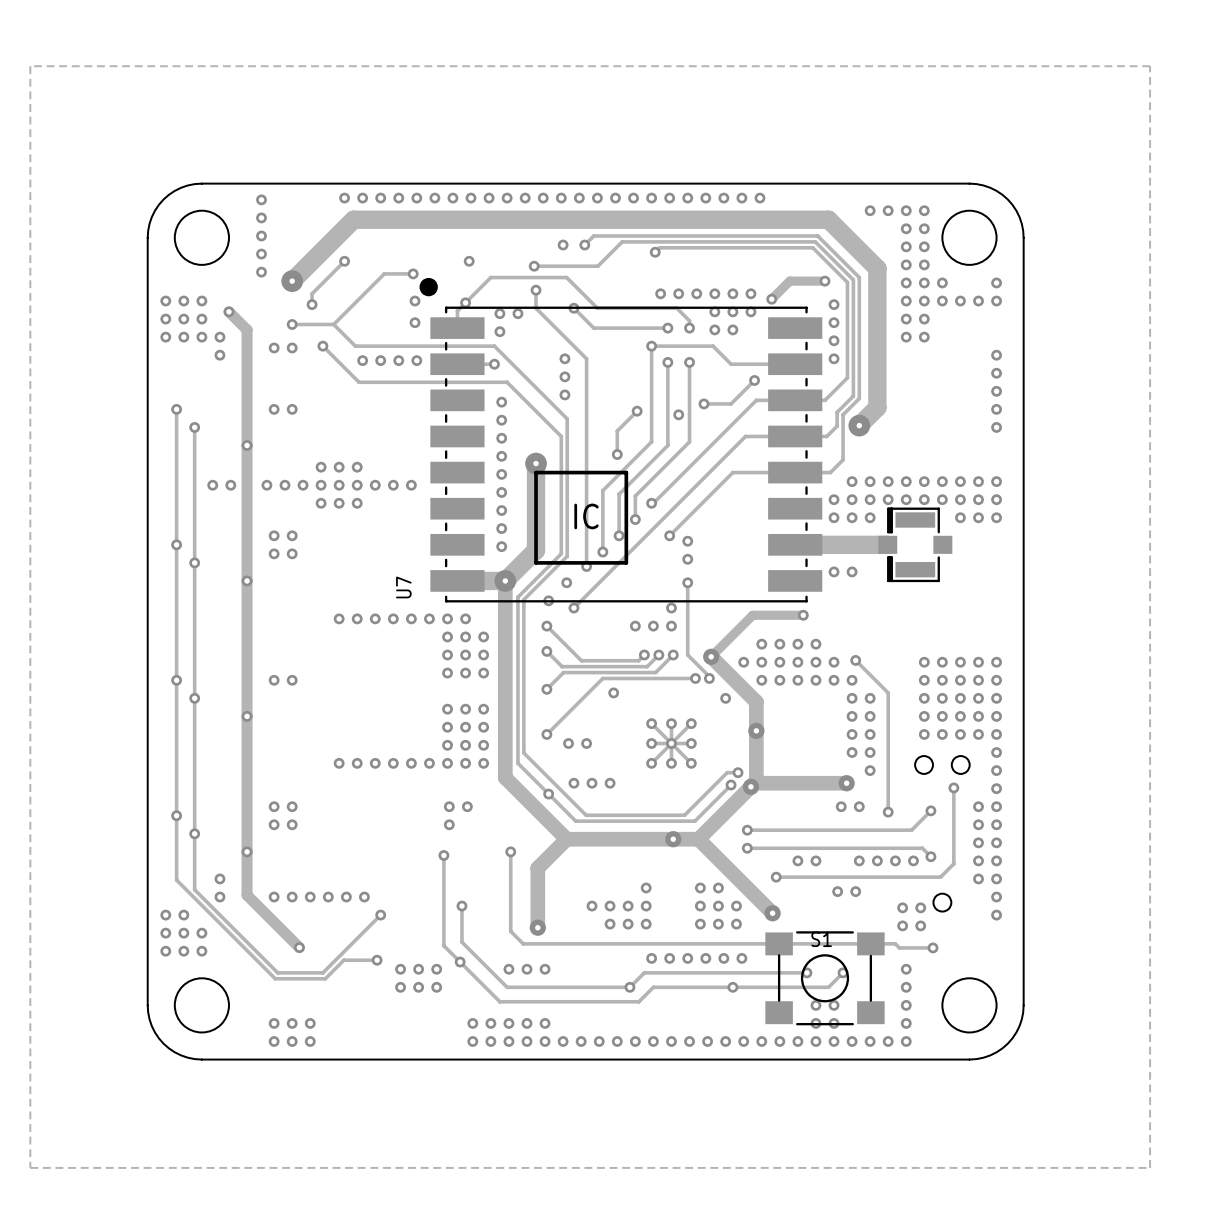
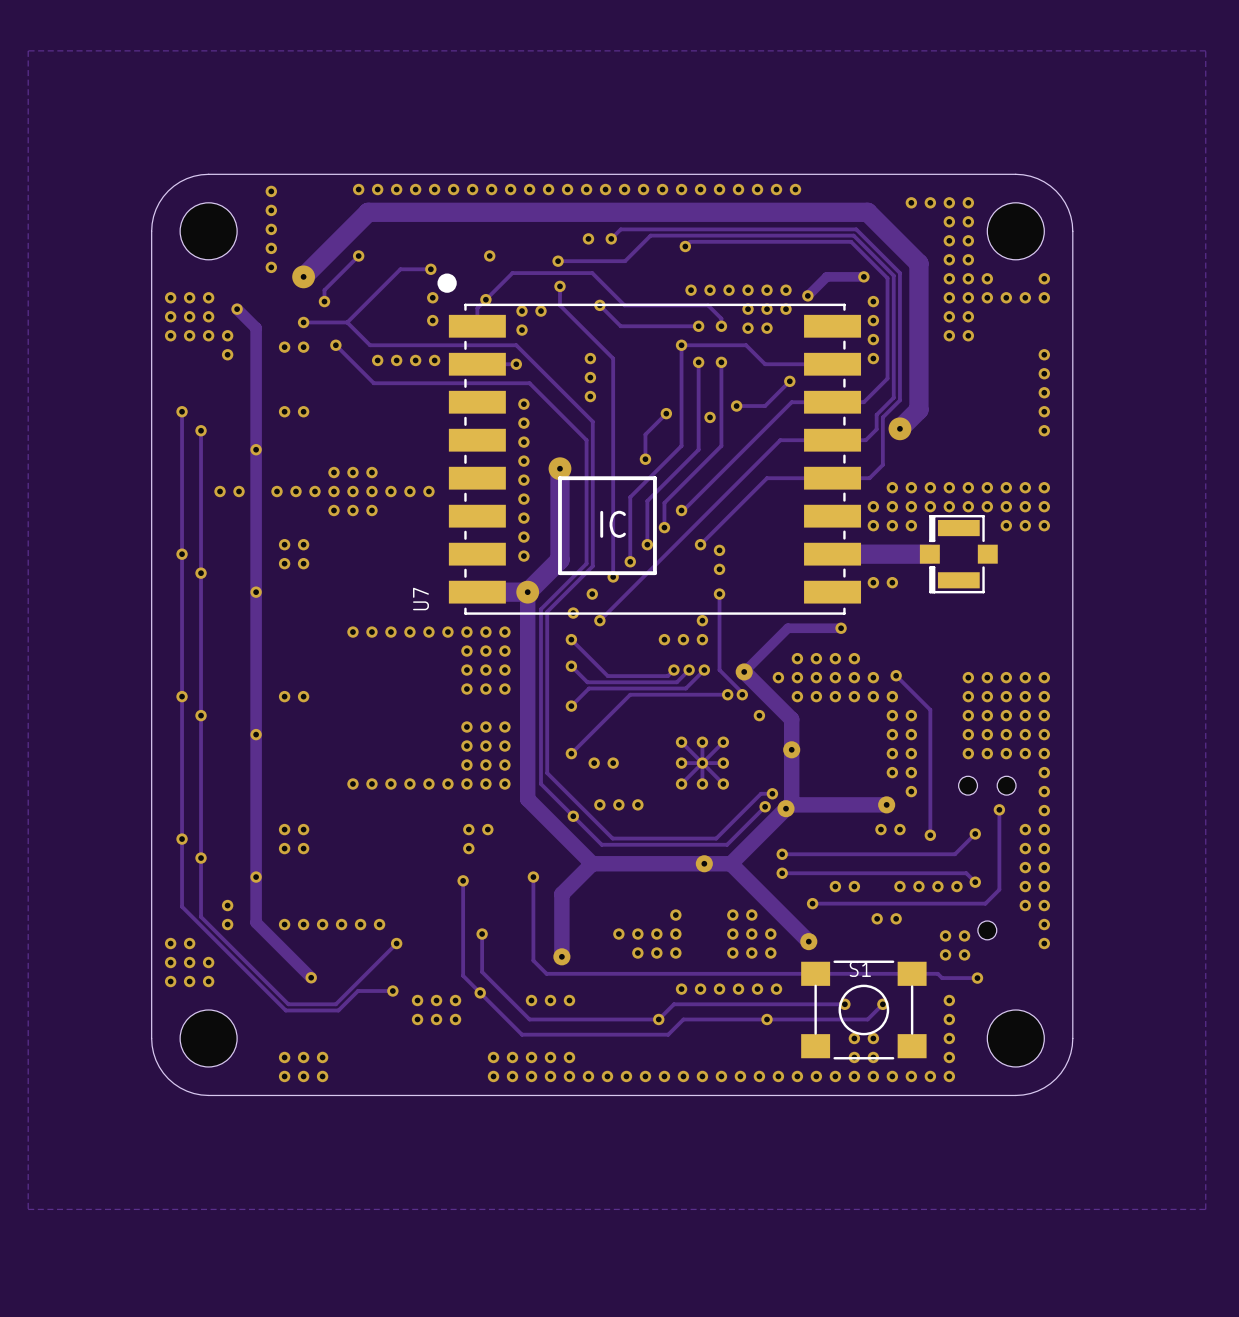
via: none -> (504, 632)
via: (613, 692) -> none

